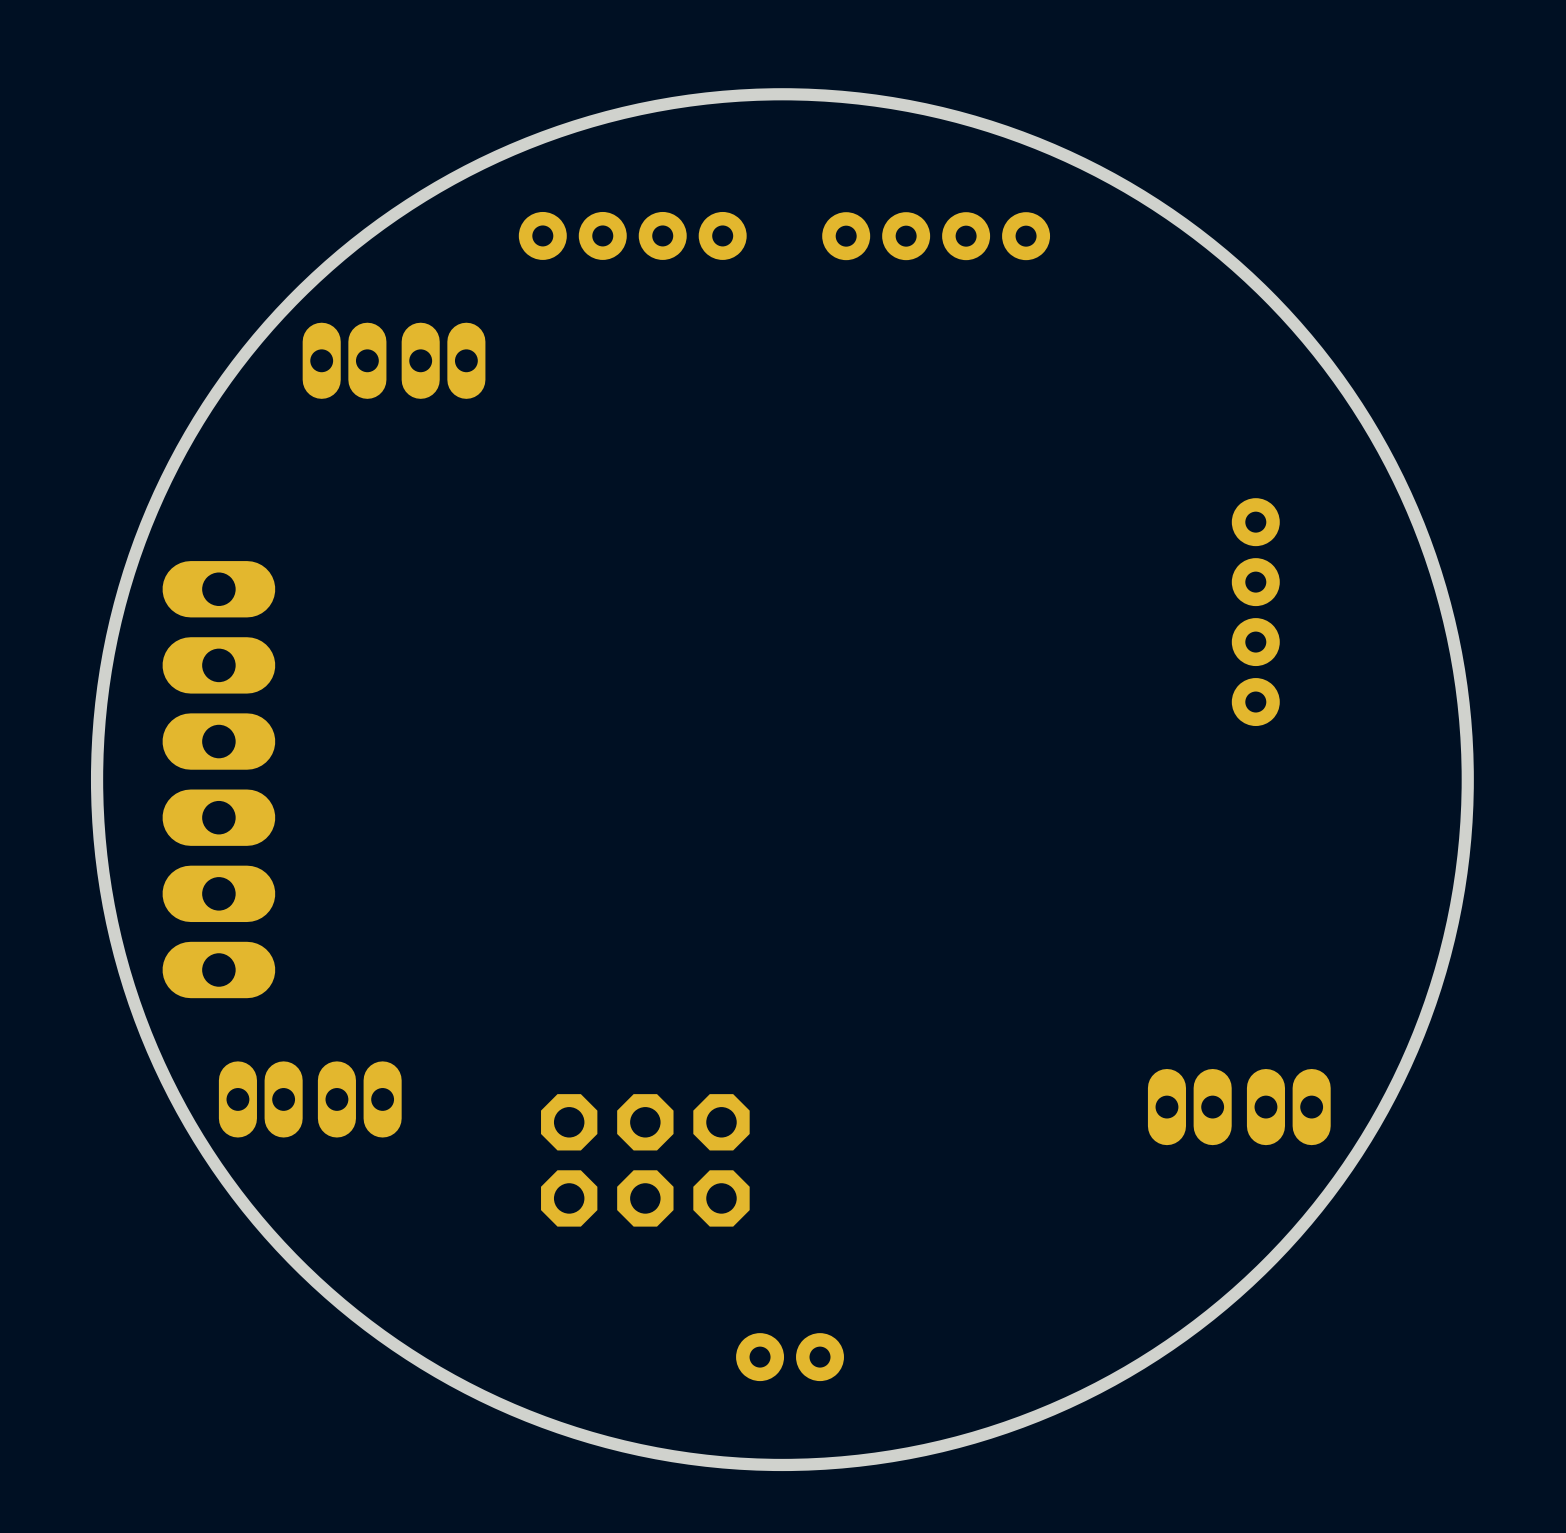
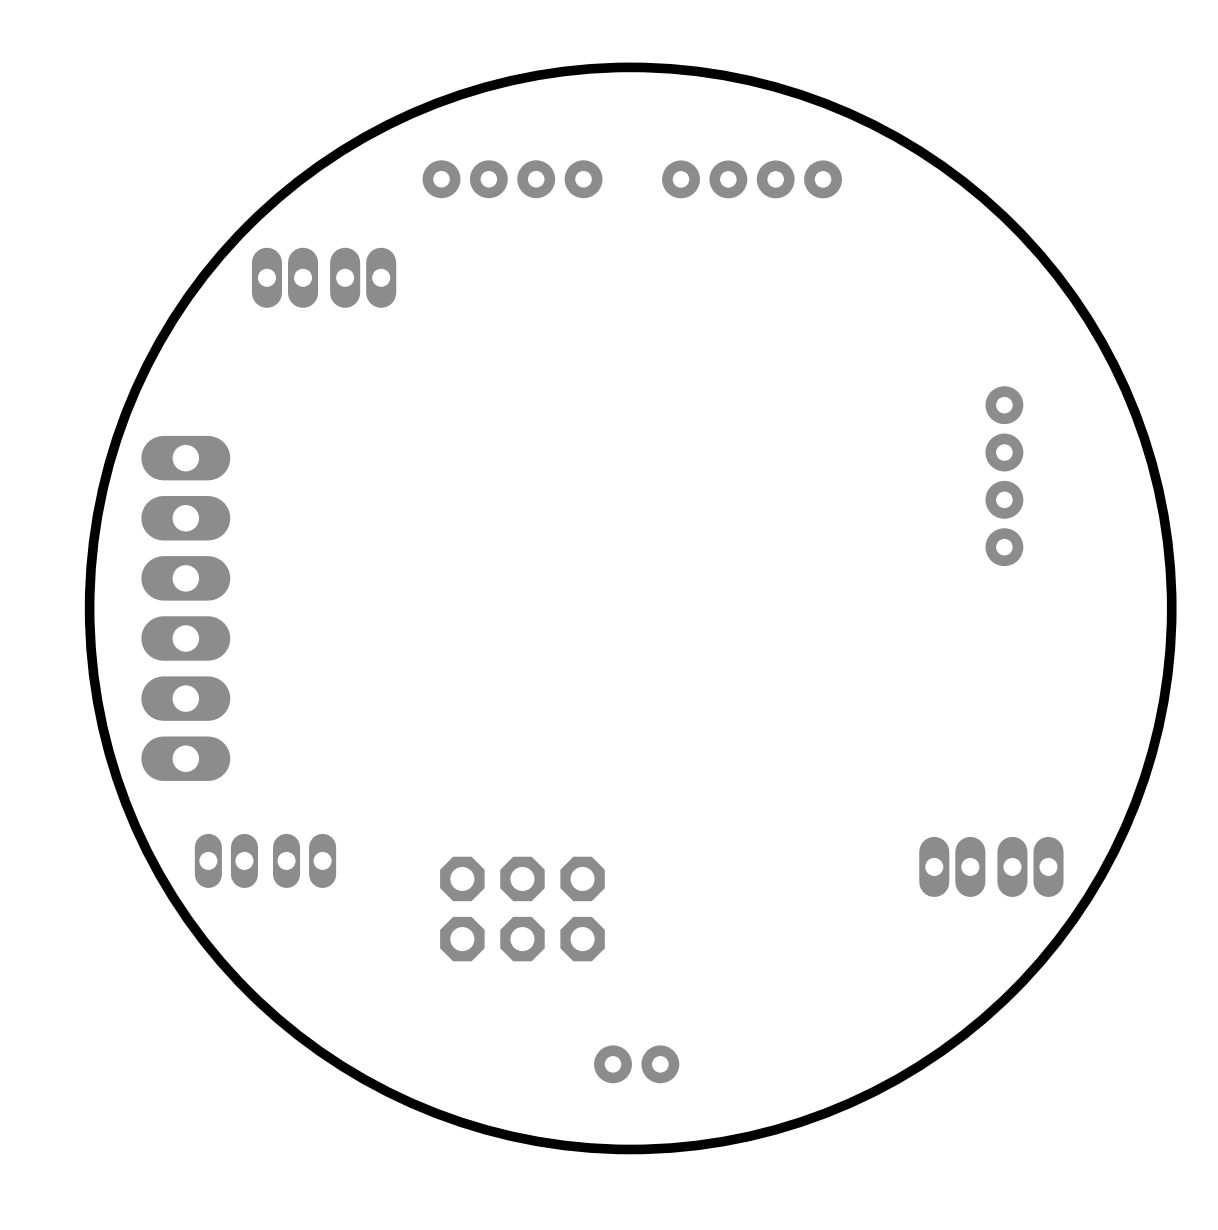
part footprint: [218, 1061, 402, 1138] -> [194, 833, 337, 888]

